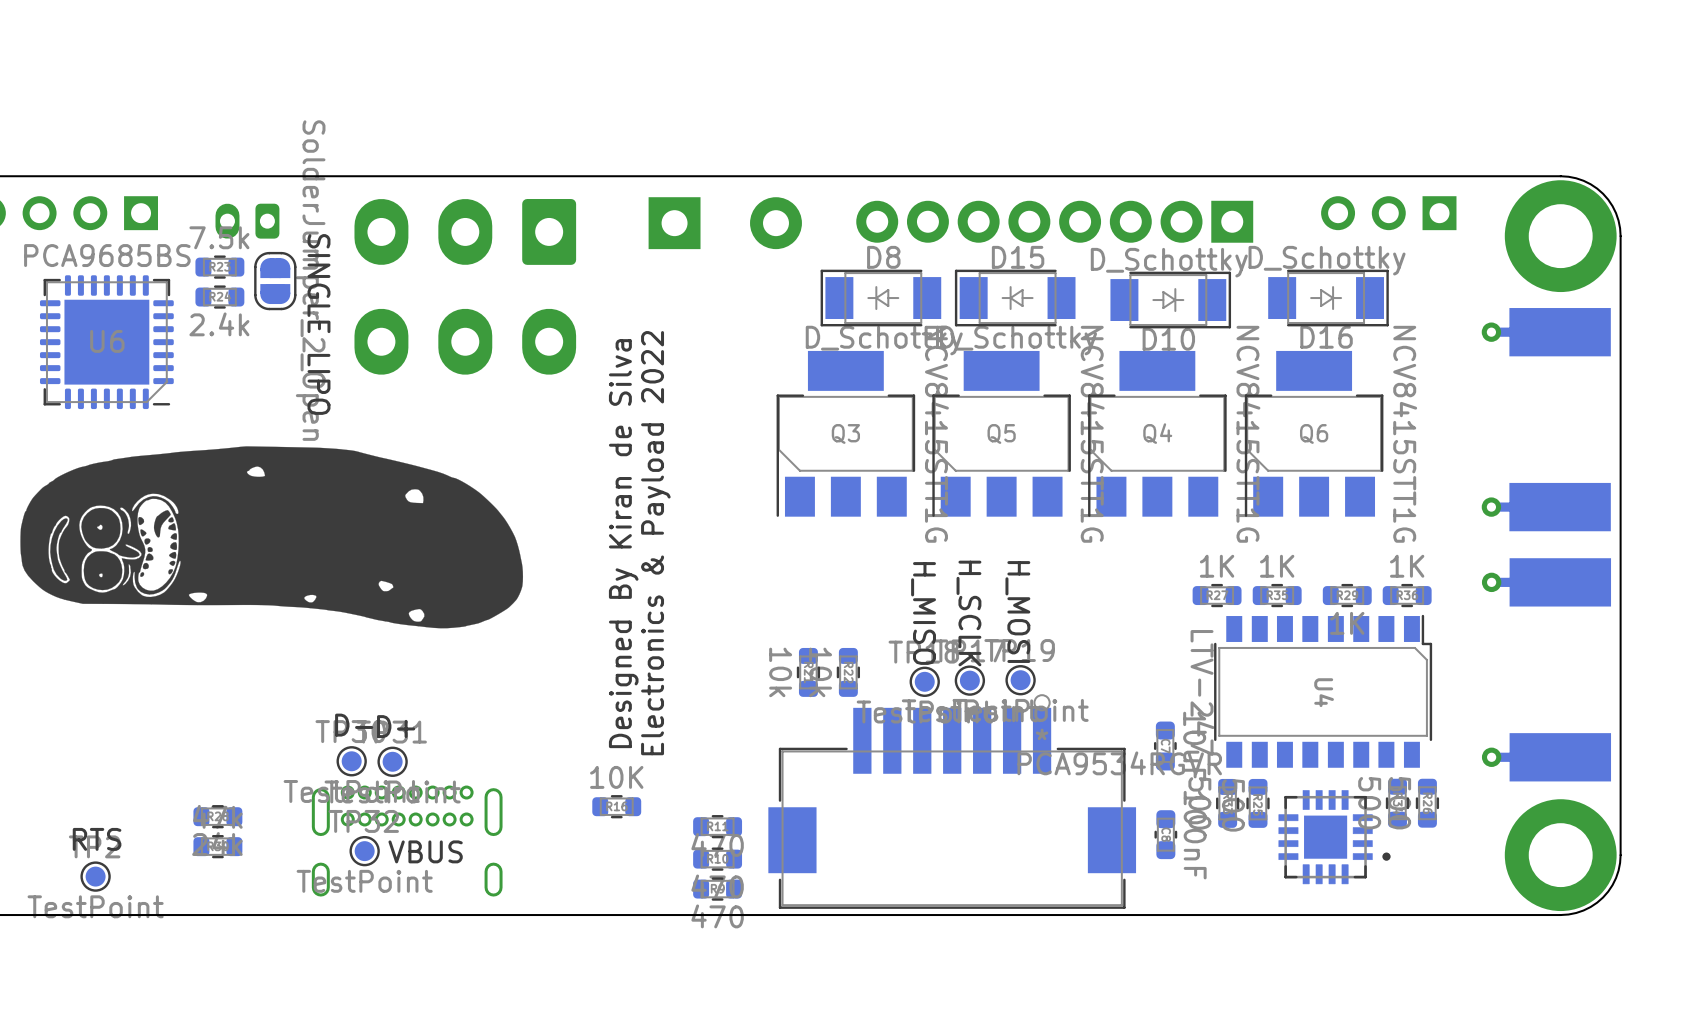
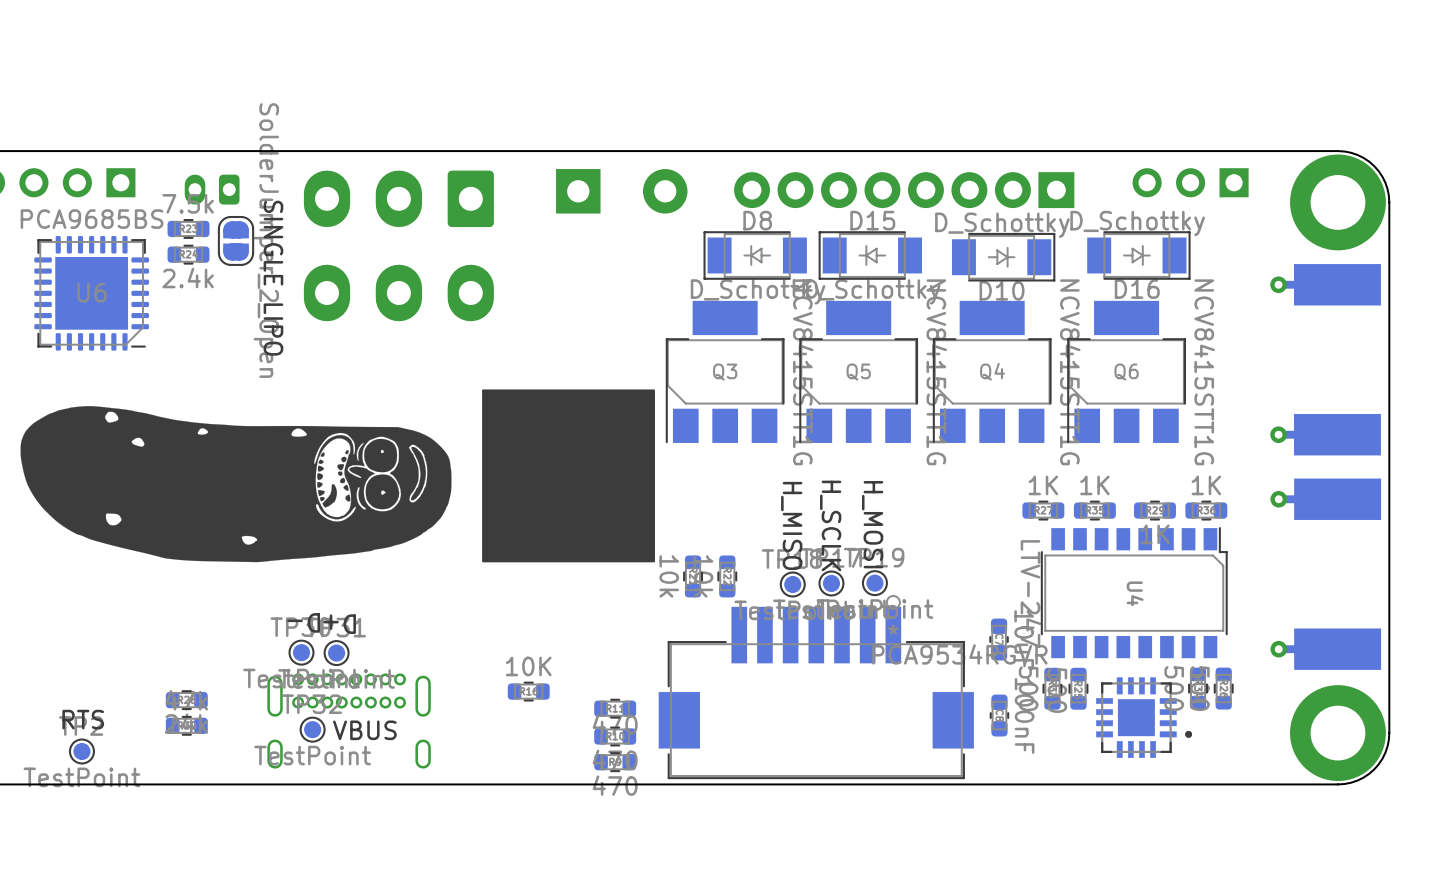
drawing: [20, 446, 524, 629] -> none
drawing: none -> [482, 389, 655, 563]
drawing: none -> [20, 406, 452, 563]
text: Designed By Kiran de Silva (623, 543) -> none
text: Electronics & Payload 2022 (655, 543) -> none
text rotation: 0° (354, 725) -> 180° (303, 622)
text rotation: 0° (396, 726) -> 180° (339, 624)

